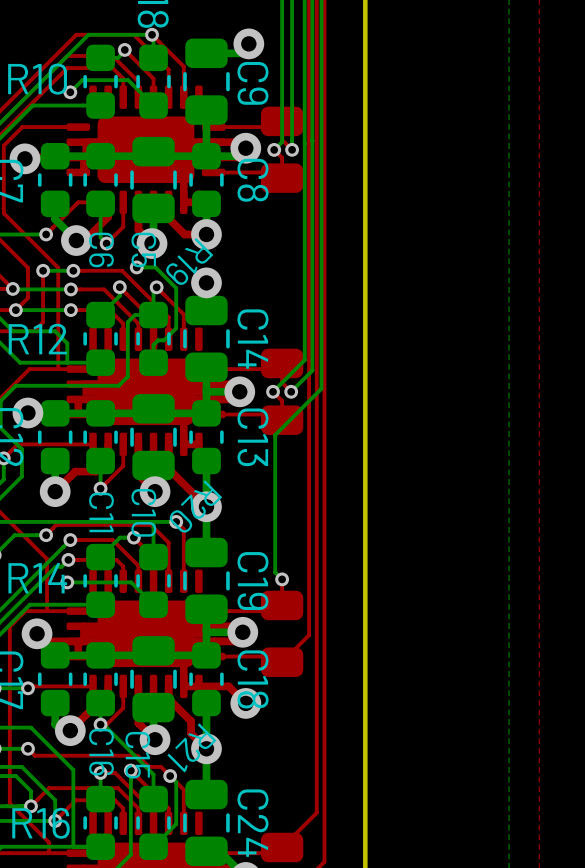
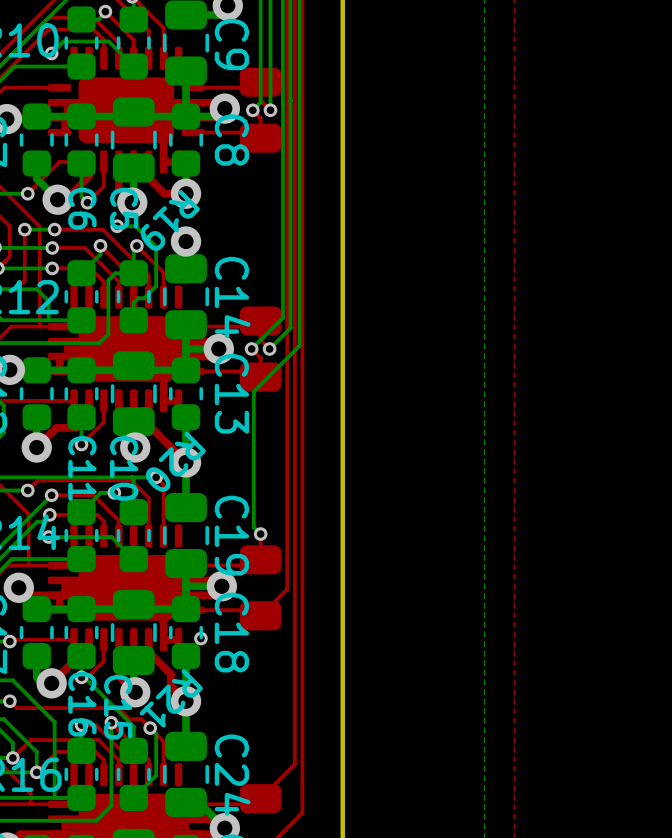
via: none -> (200, 638)
top track: (198, 686) (228, 686) (245, 703) -> none
via: (245, 703) -> none

